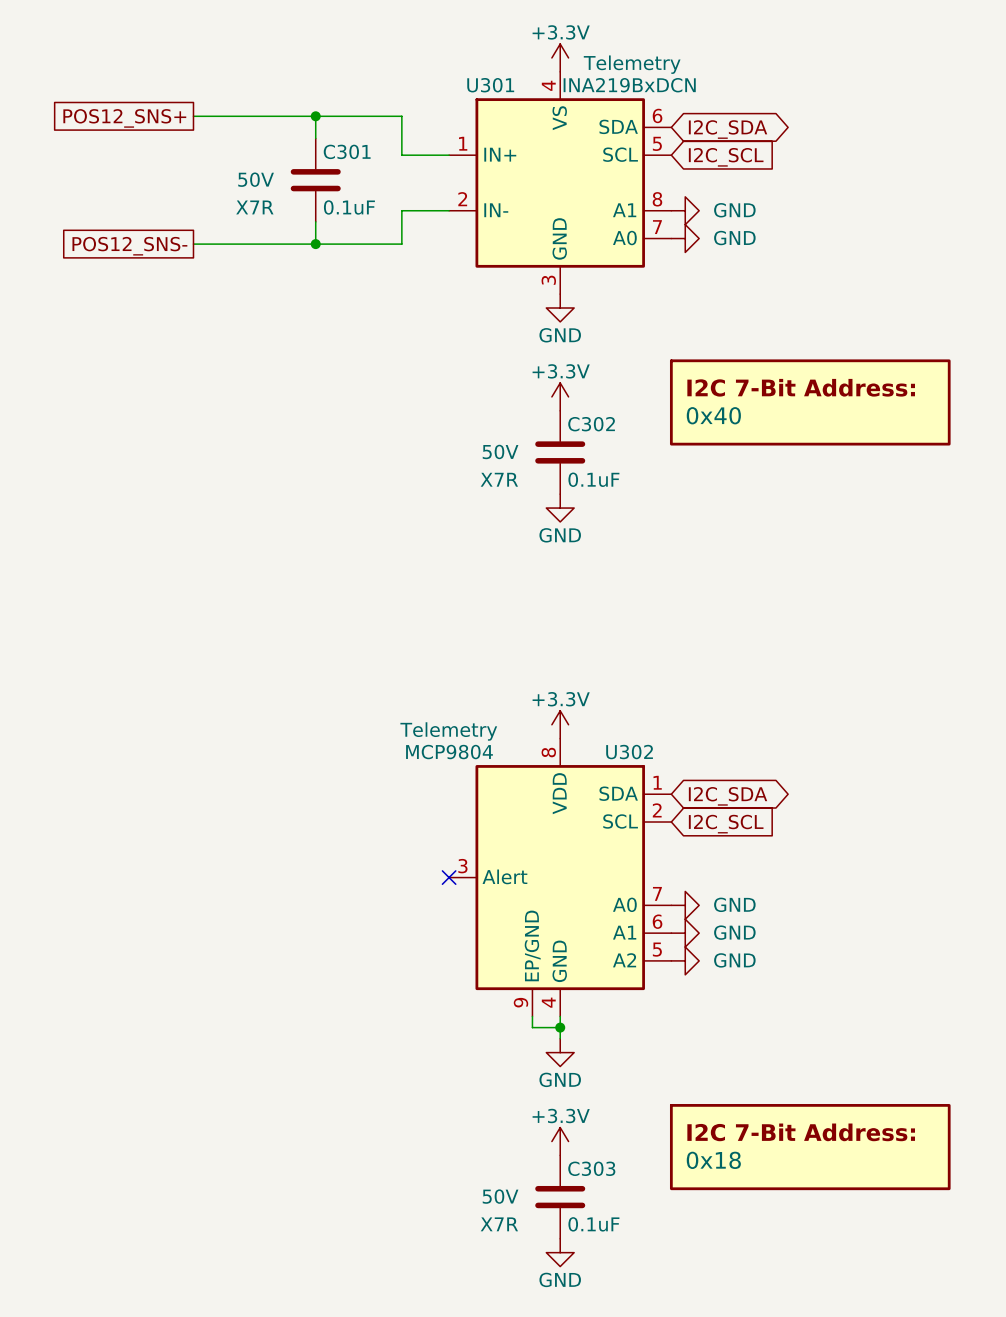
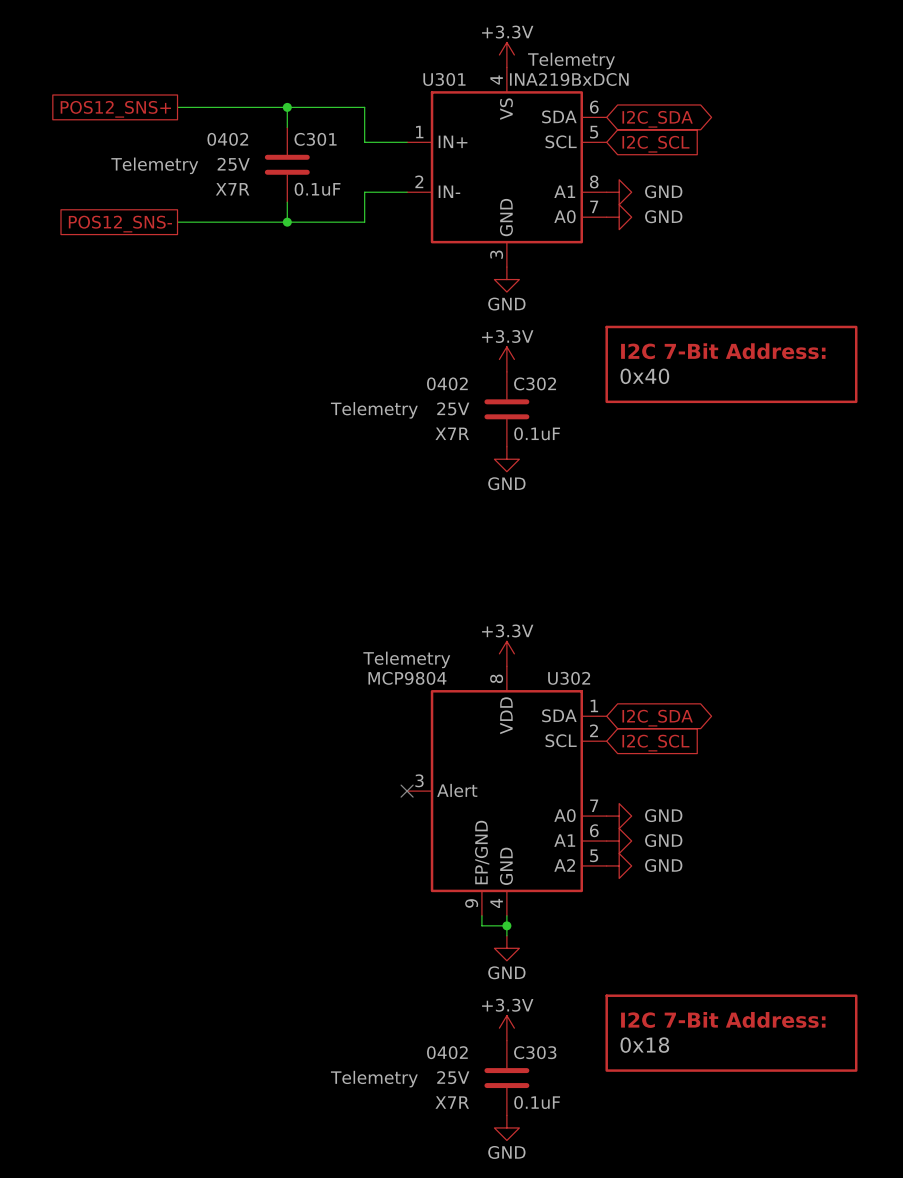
C301 text: none -> 0402 (227, 139)
C301 text: 50V (256, 179) -> 25V (233, 164)
C301 text: none -> Telemetry (154, 165)
C302 text: none -> 0402 (447, 383)
C302 text: 50V (500, 451) -> 25V (453, 408)
C302 text: none -> Telemetry (374, 410)
C303 text: none -> 0402 (447, 1052)
C303 text: 50V (500, 1196) -> 25V (453, 1077)
C303 text: none -> Telemetry (374, 1079)

